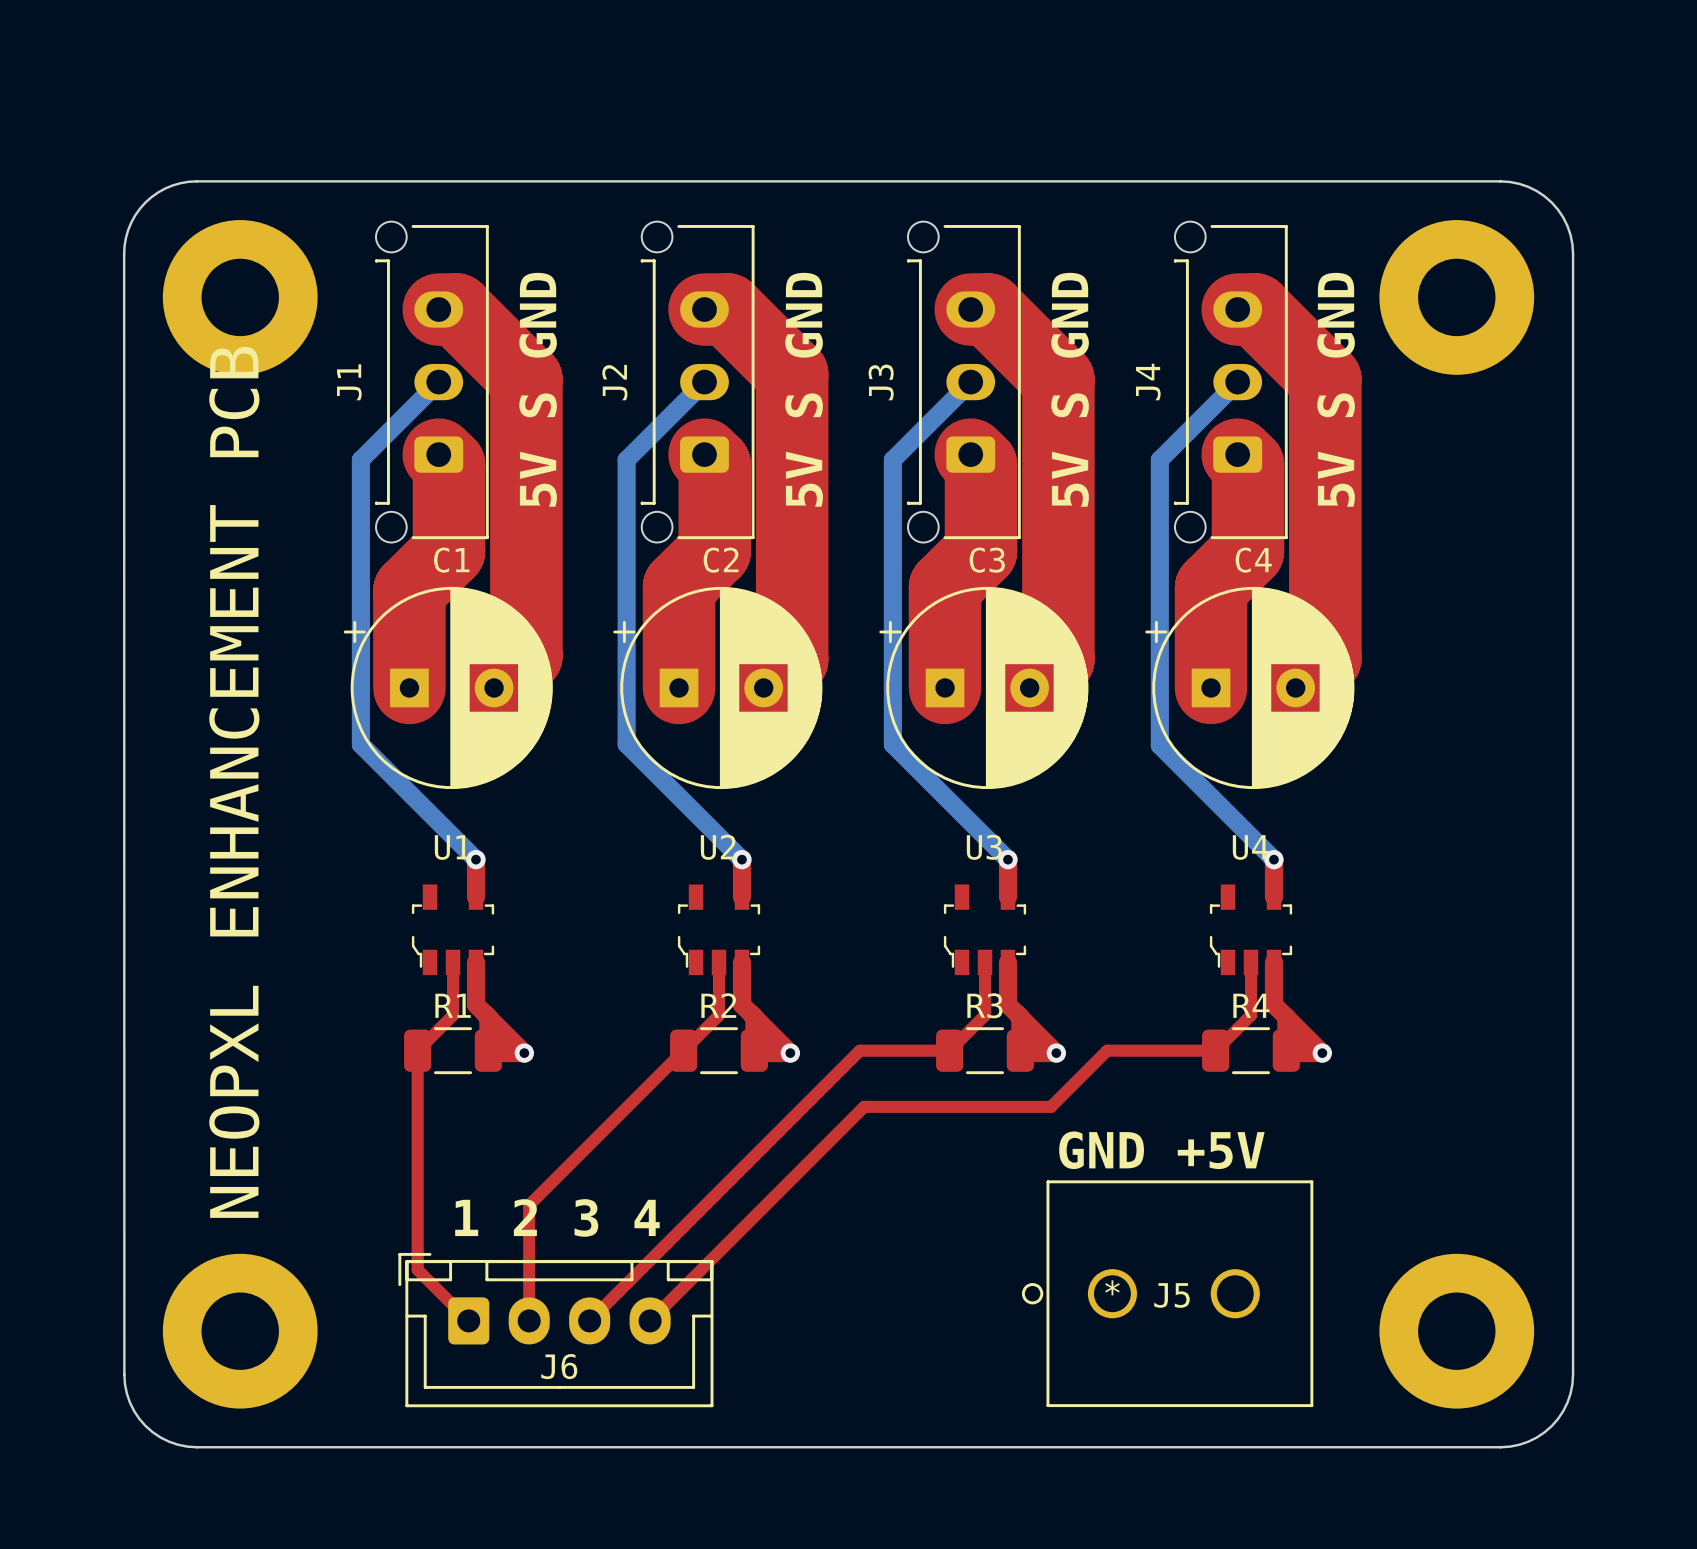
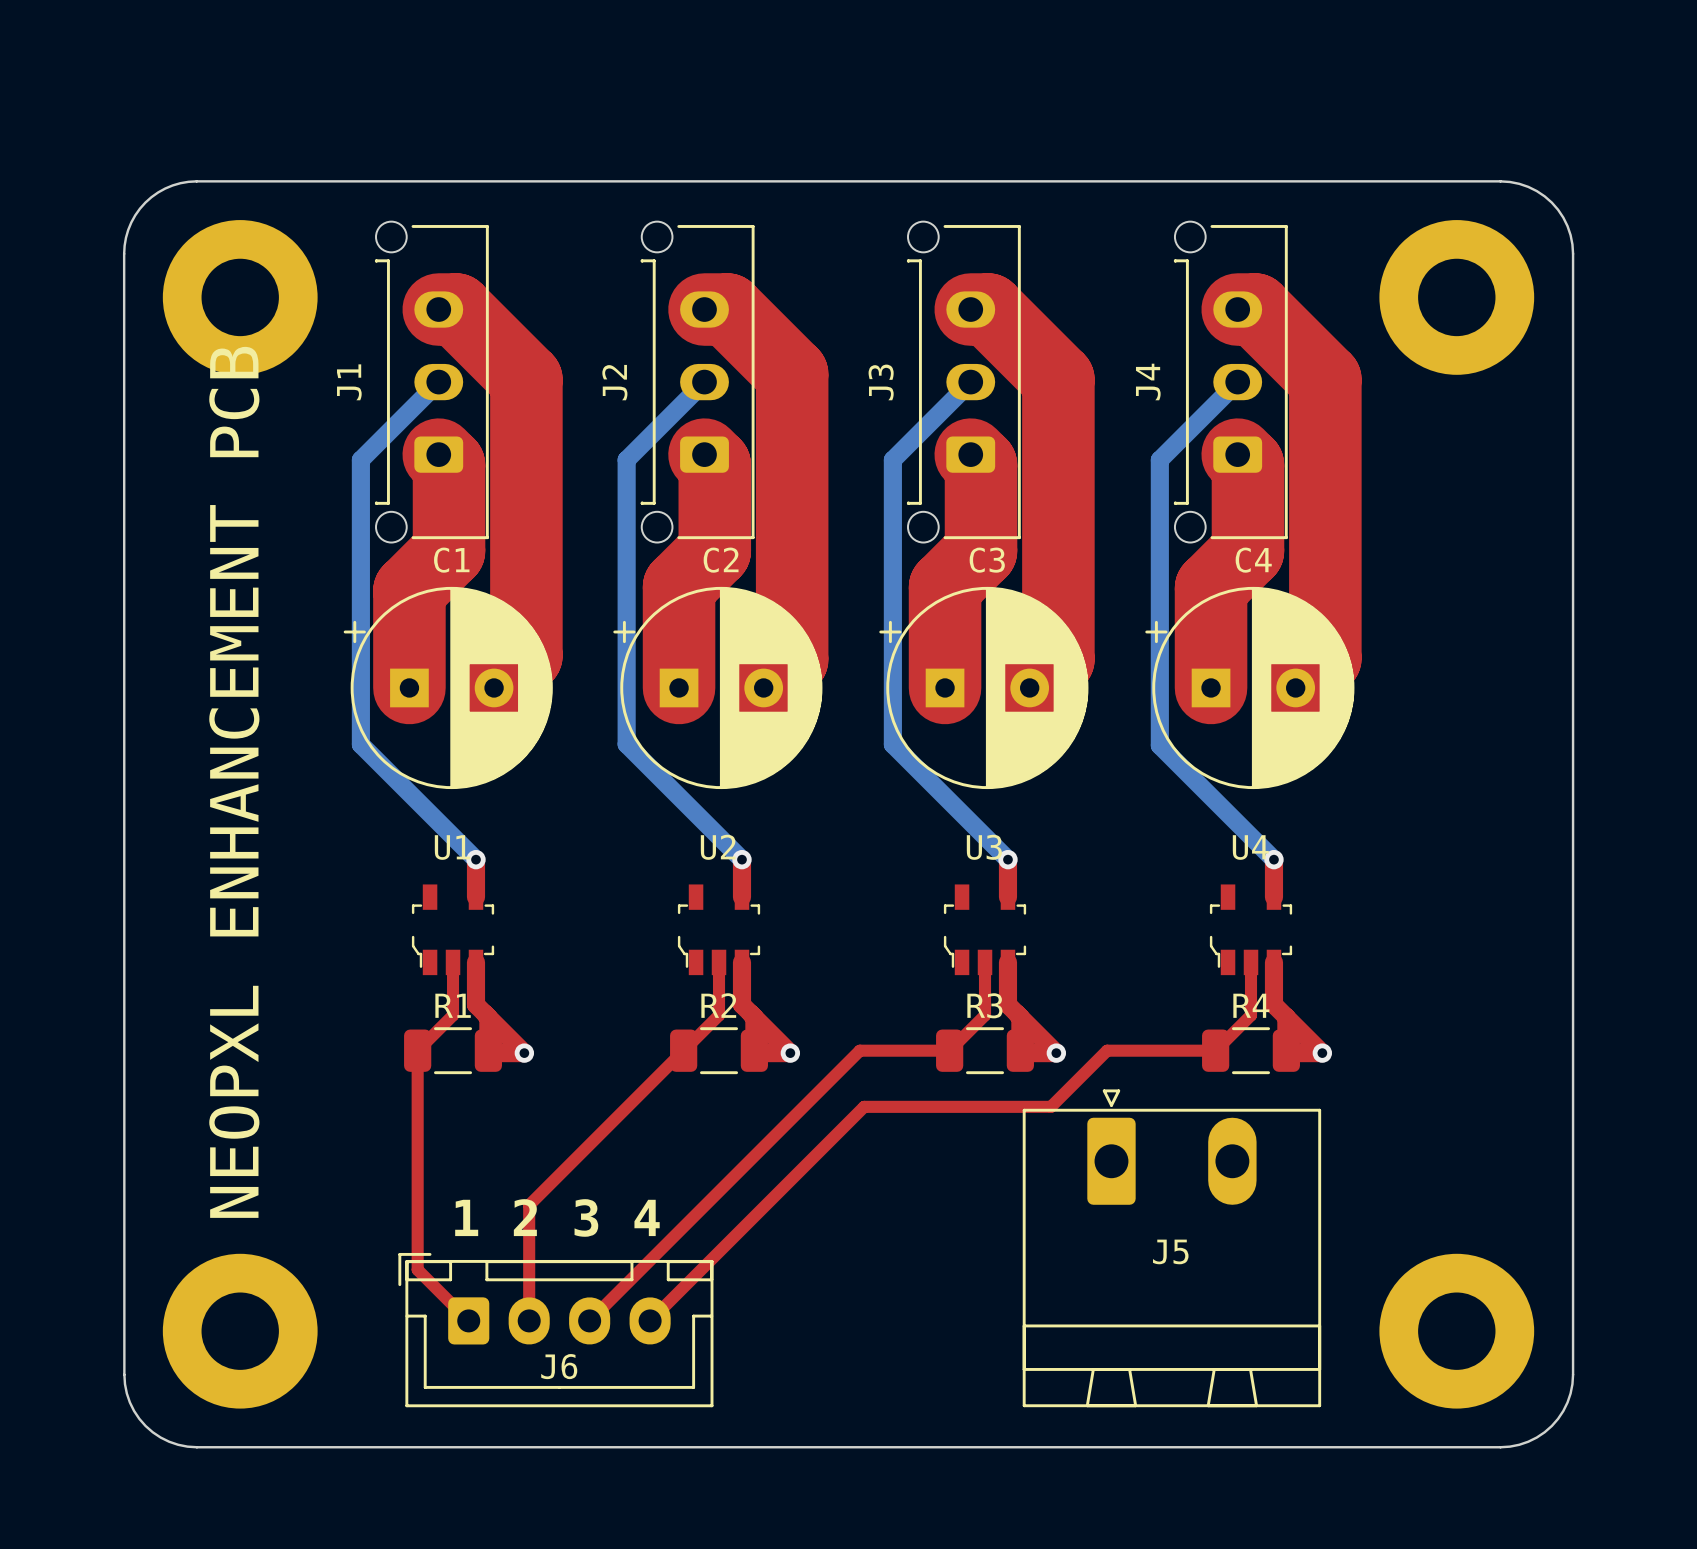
text: 5V S GND (538, 389) -> none
text: 5V S GND (804, 389) -> none
text: 5V S GND (1070, 389) -> none
text: 5V S GND (1336, 389) -> none
text: GND +5V (1161, 1150) -> none
J5 footprint: [1021, 1180, 1314, 1408] -> [1022, 1089, 1322, 1408]

